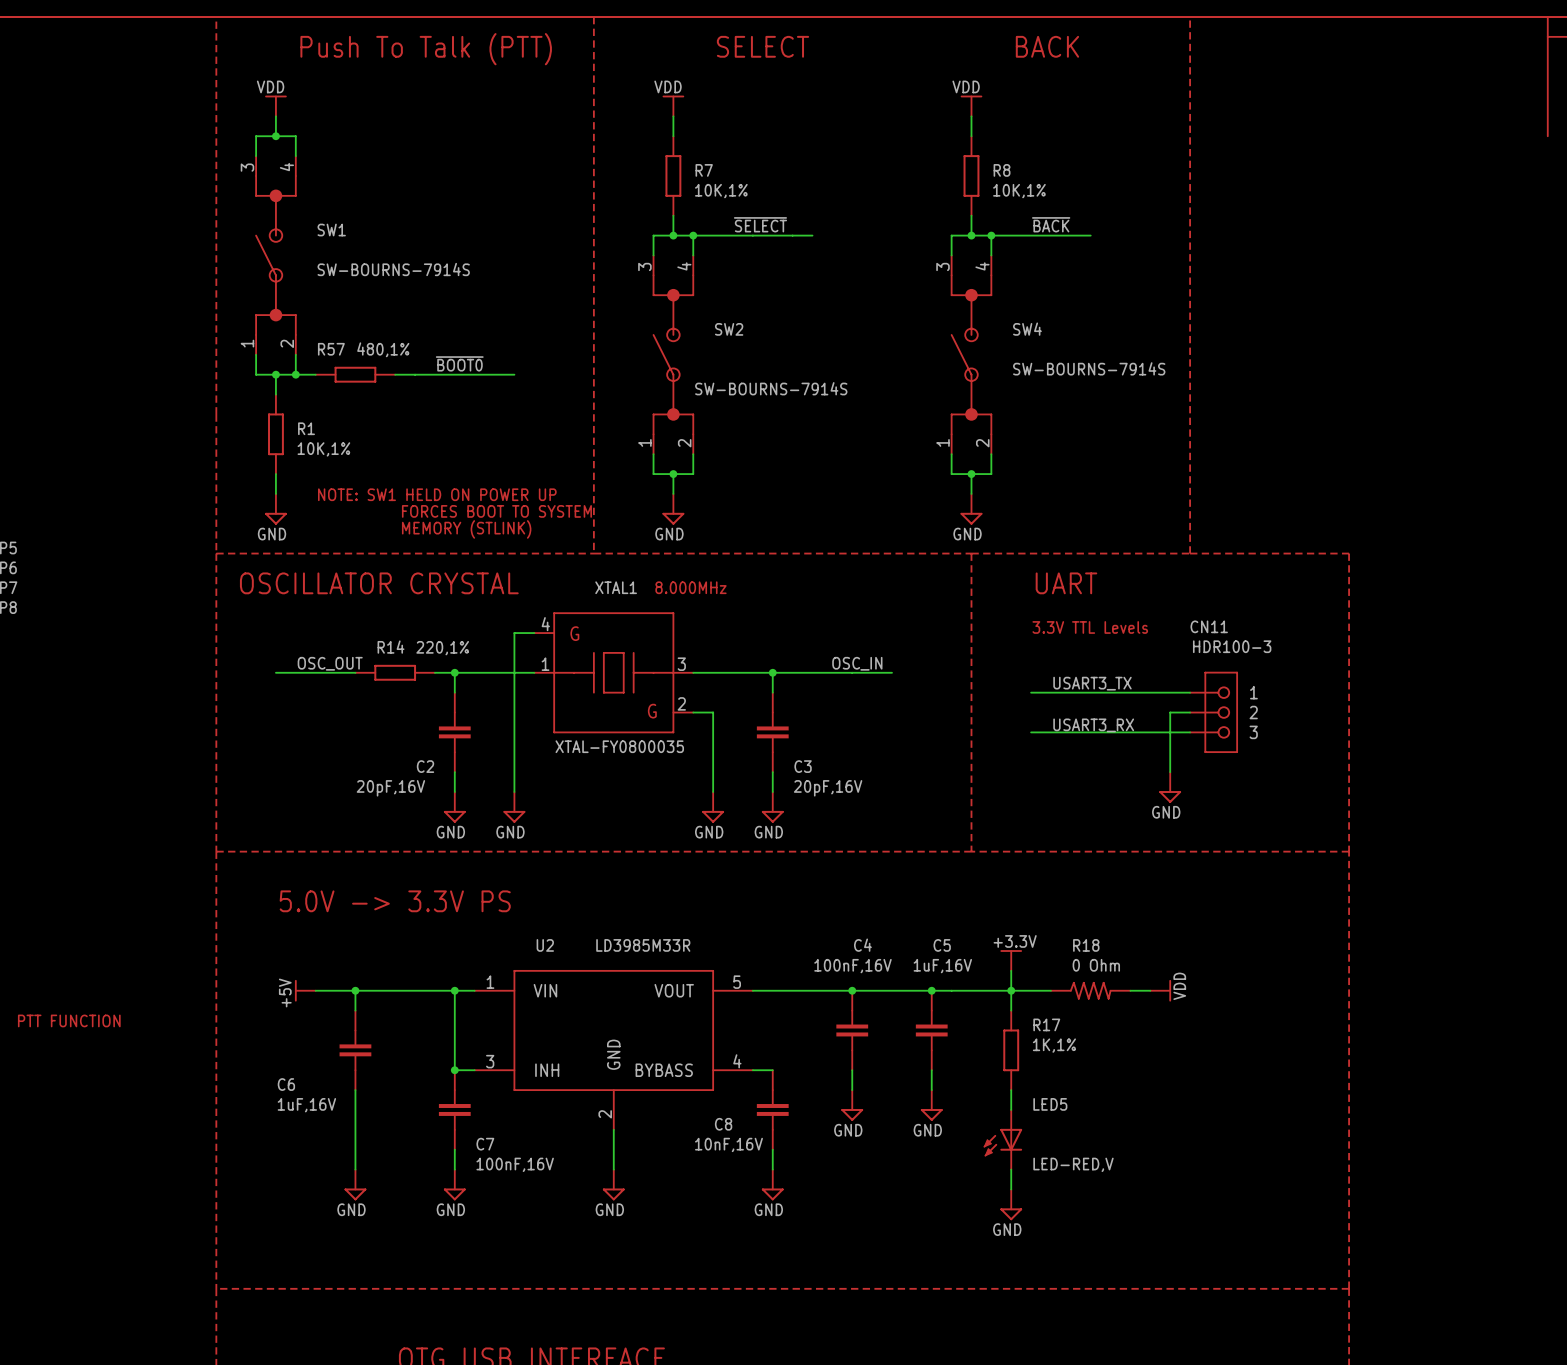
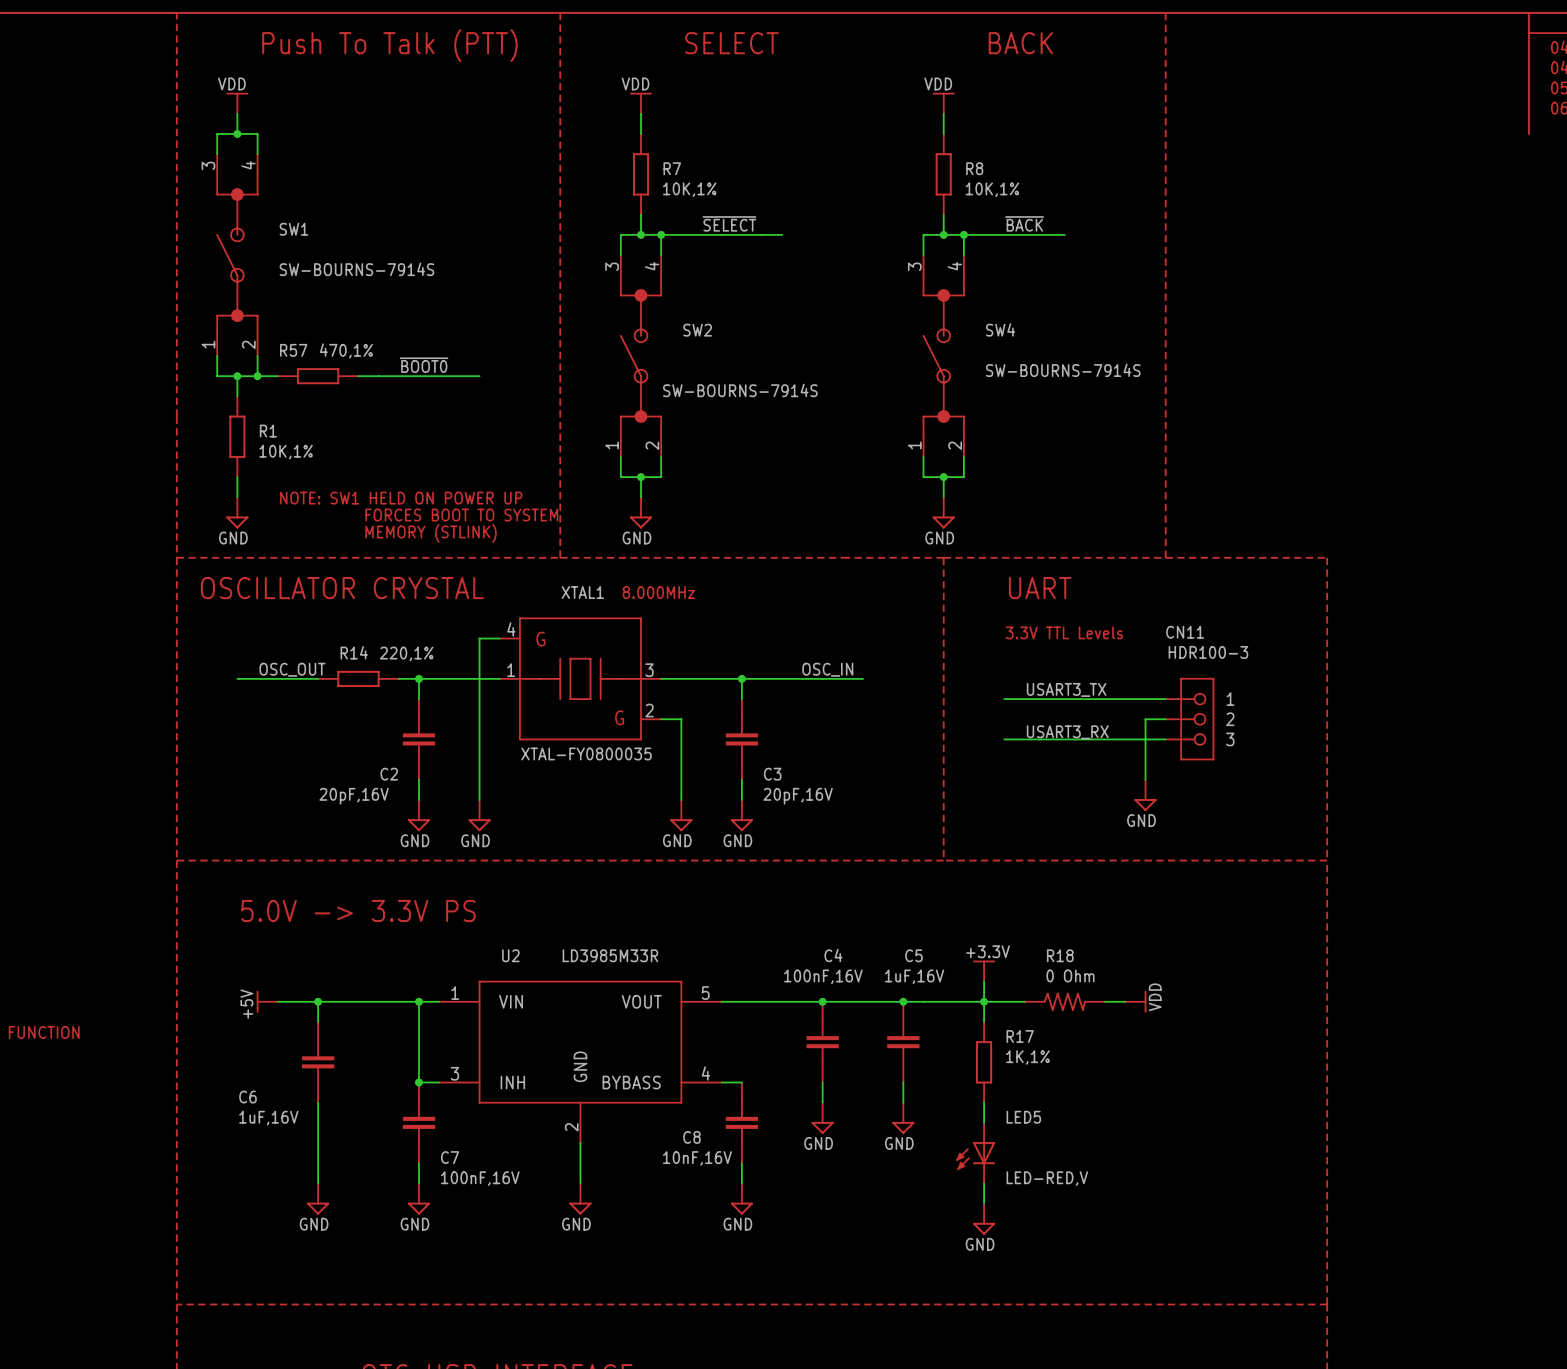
R57 value: 480,1% (383, 349) -> 470,1% (346, 350)

